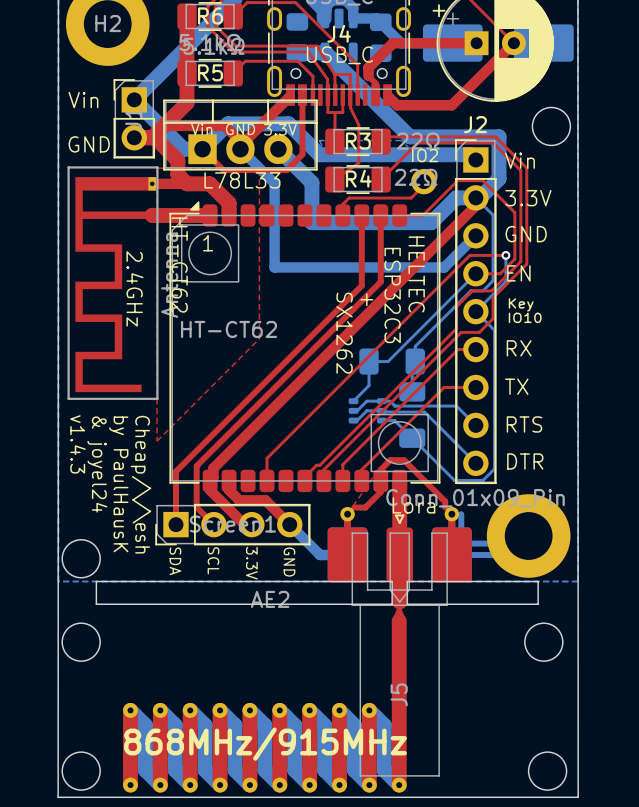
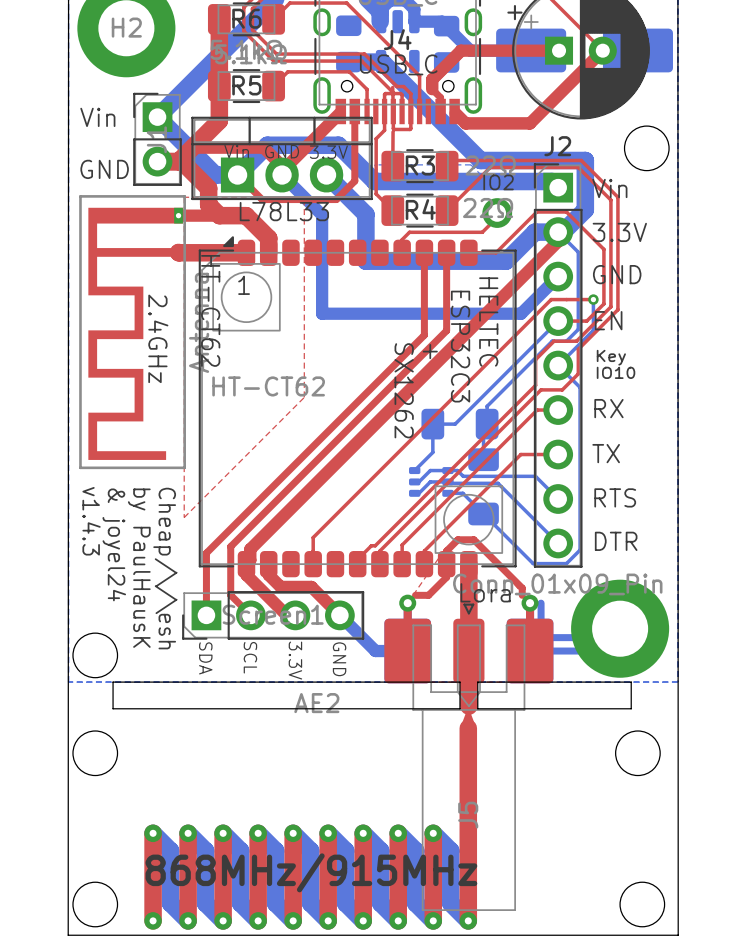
top track: (310, 46) (317, 46) (334, 74) (350, 74) (350, 108) (358, 125) (358, 162) (334, 179) -> (402, 111) (402, 94) (385, 93) (384, 130) (376, 138) (376, 193) (392, 210)
top track: none -> (364, 54) (397, 86) (403, 86) (410, 93) (409, 129) (393, 128) (393, 111)
top track: (308, 52) (327, 79) (327, 112) (342, 112) (342, 95) -> (361, 61) (394, 93)

